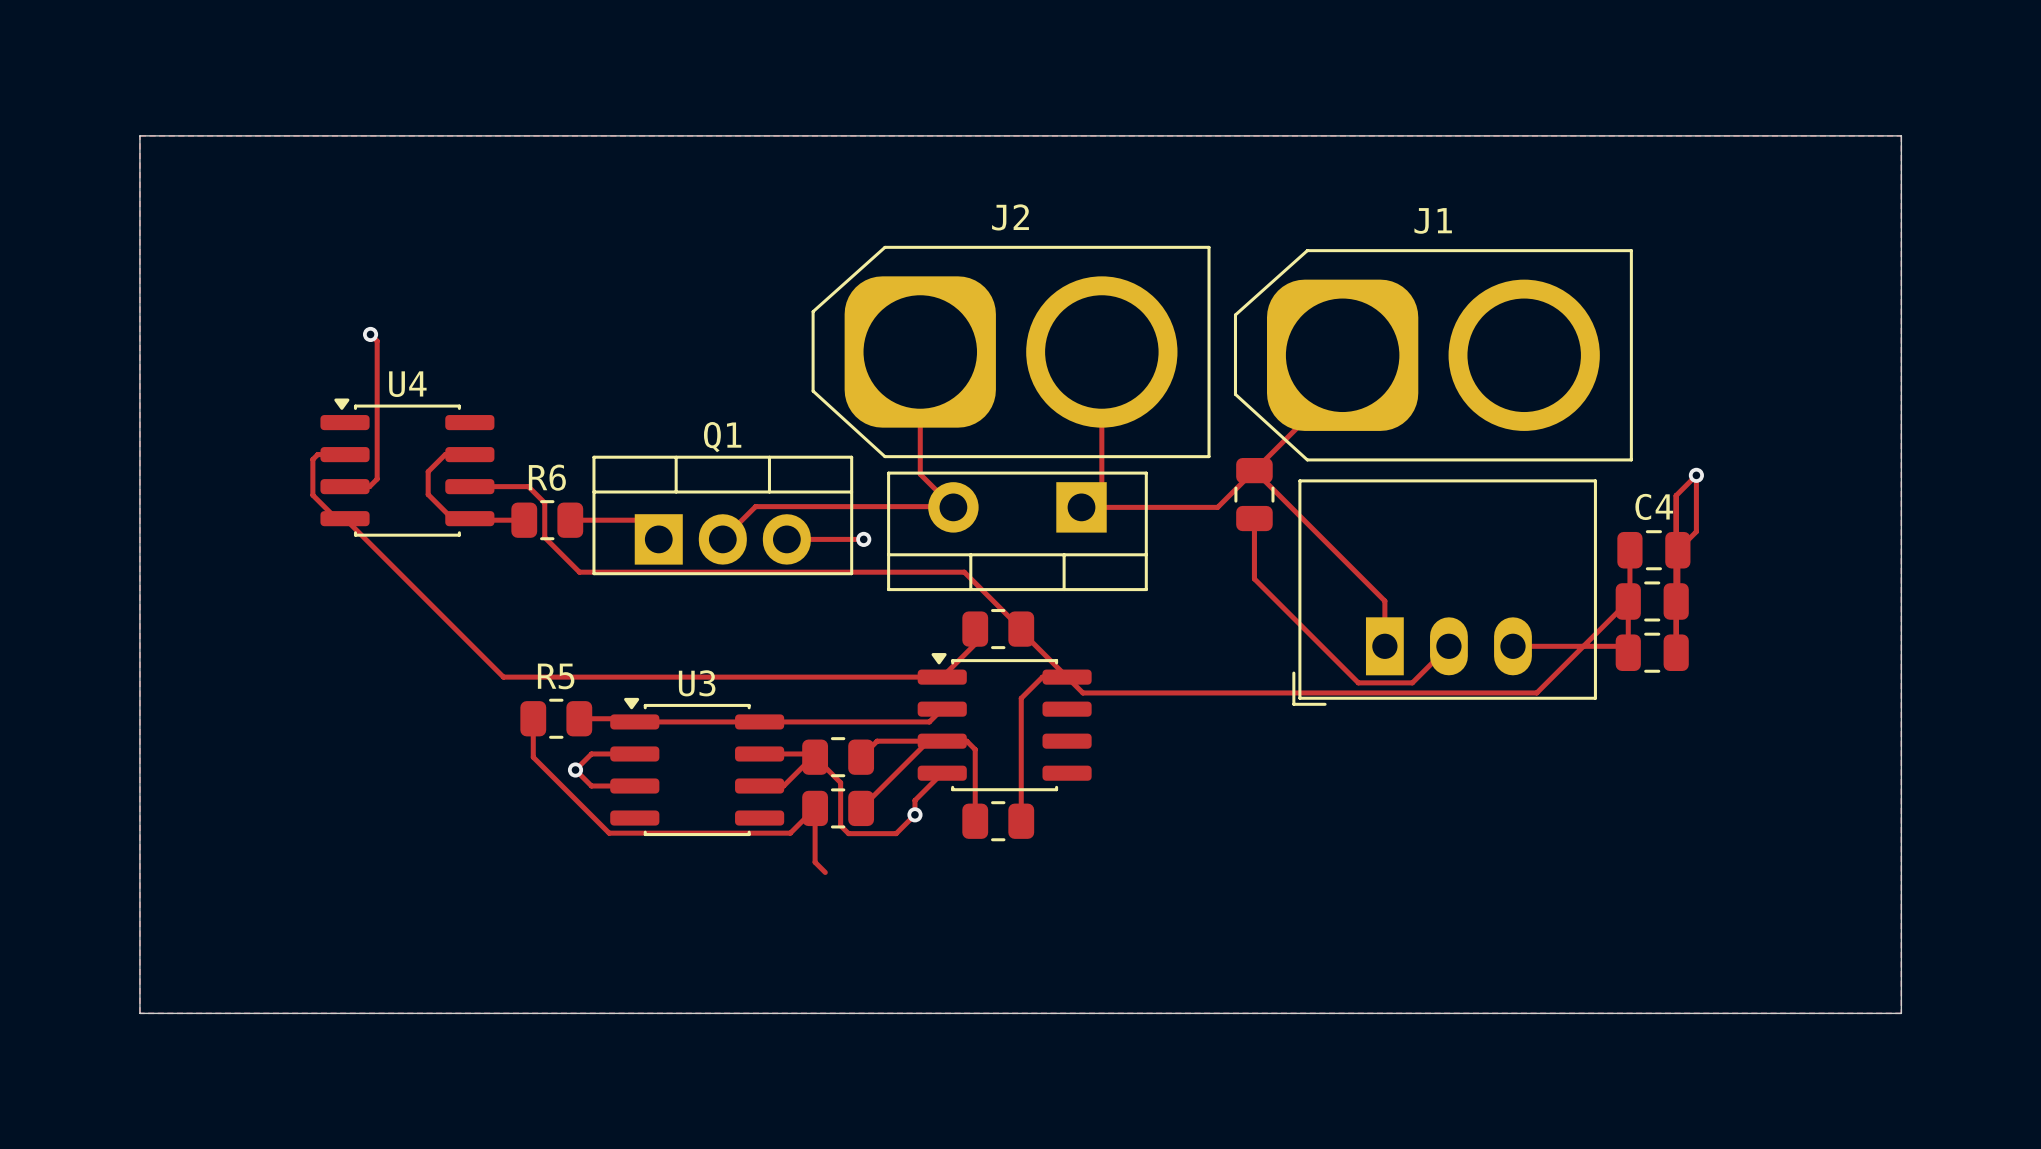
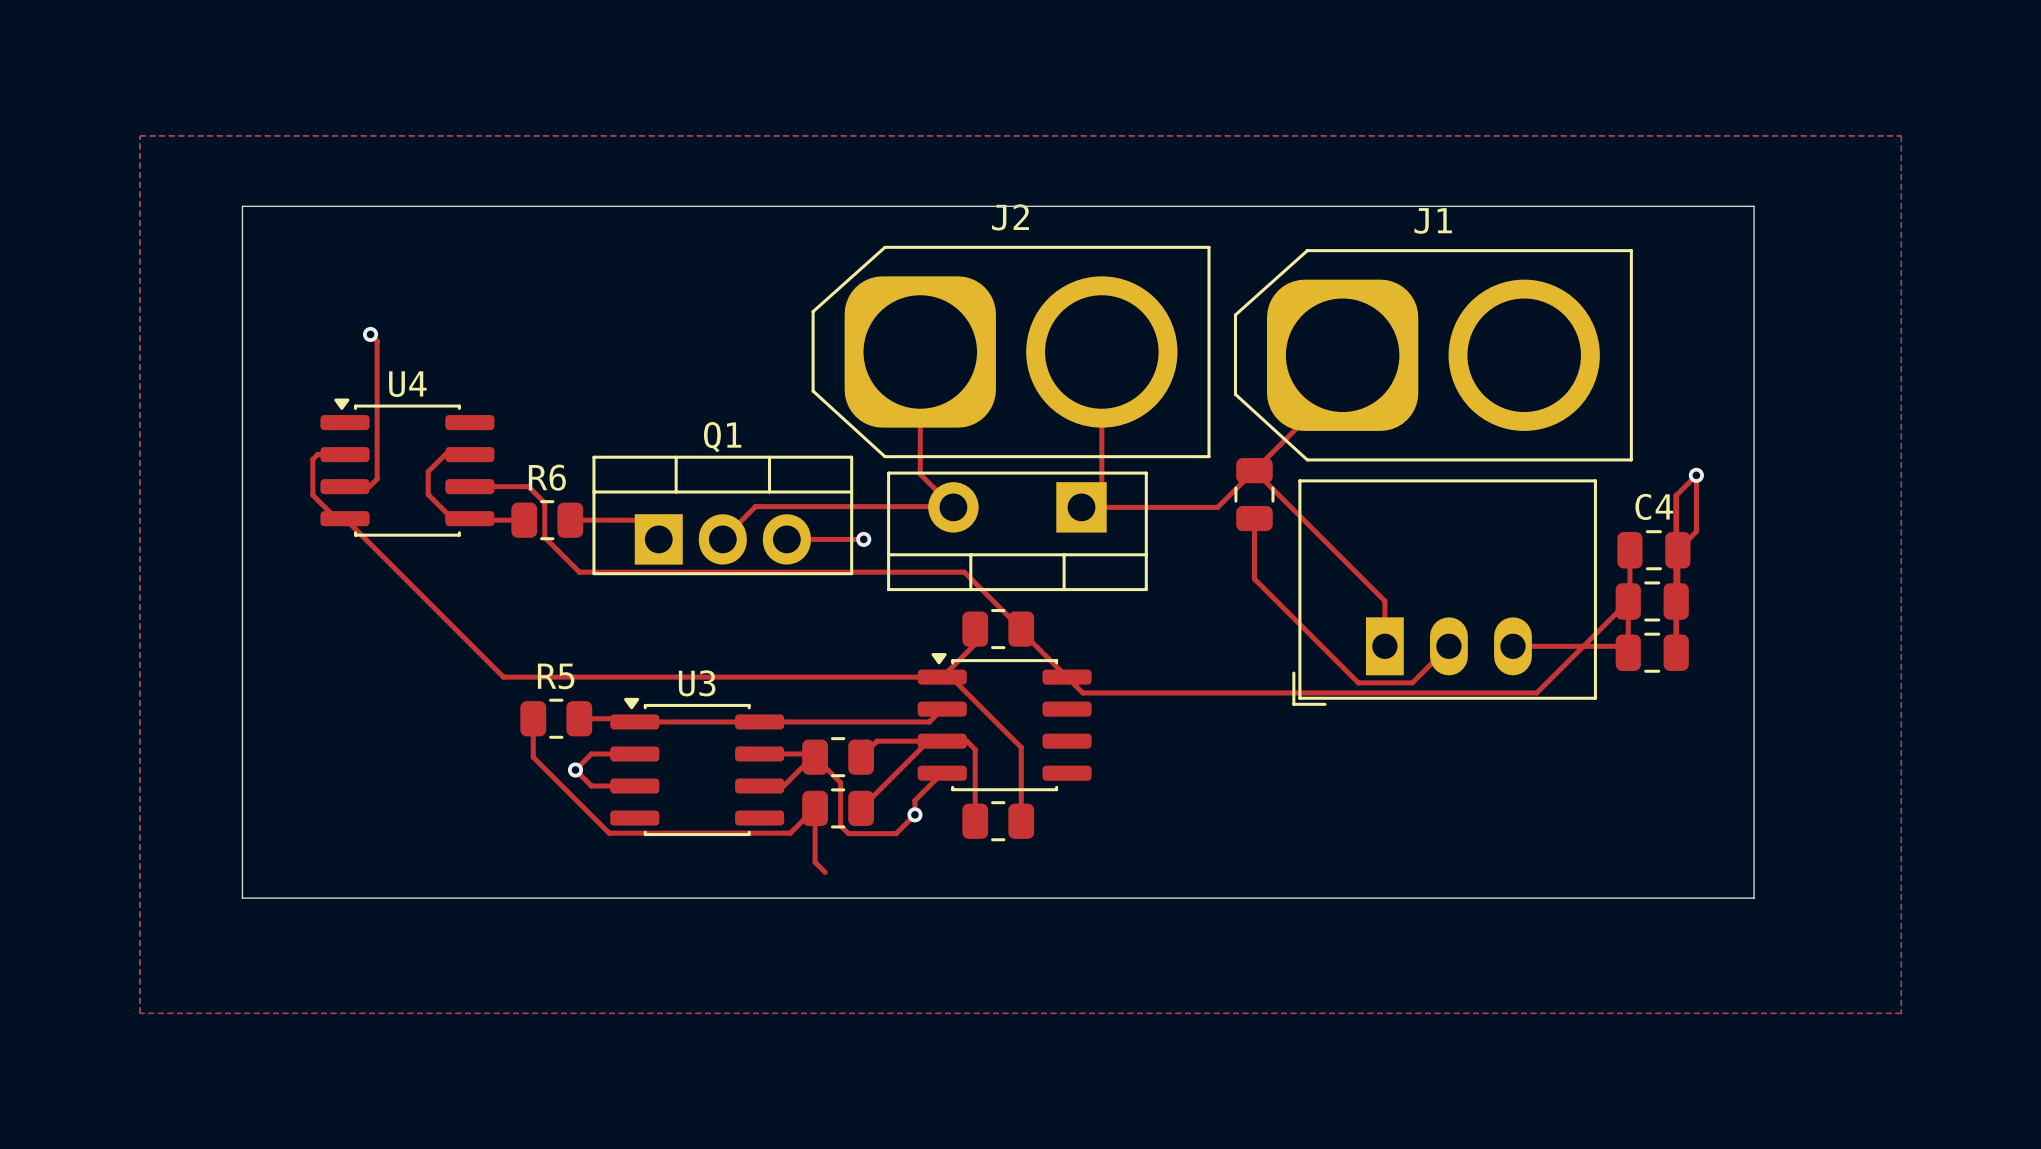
board edge: (139, 135) (1901, 135) (1901, 1013) (139, 1013) (139, 135) -> (242, 206) (242, 898) (1754, 898) (1754, 206) (242, 206)
top track: (1067, 677) (1042, 677) (1021, 698) (1021, 747) -> (942, 677) (950, 677) (1021, 747)

